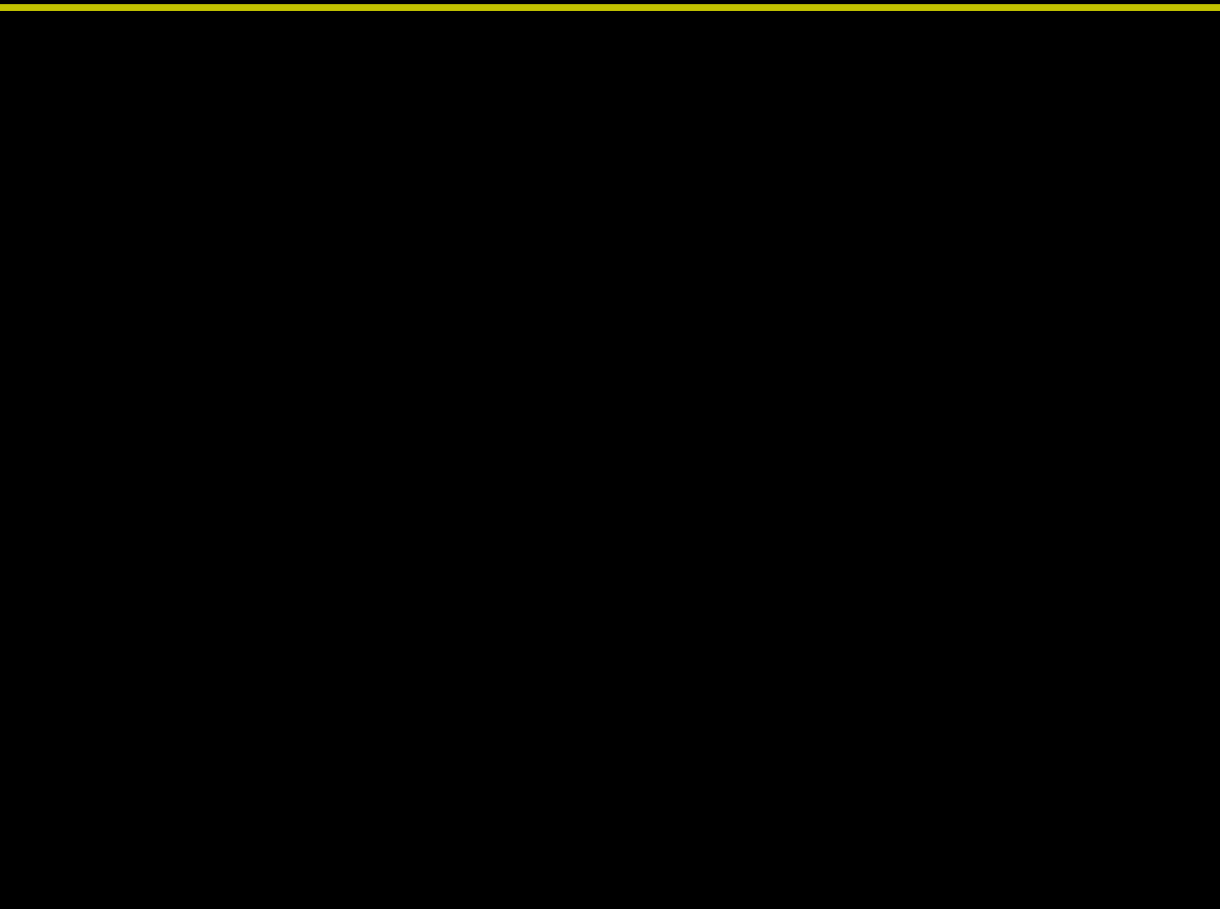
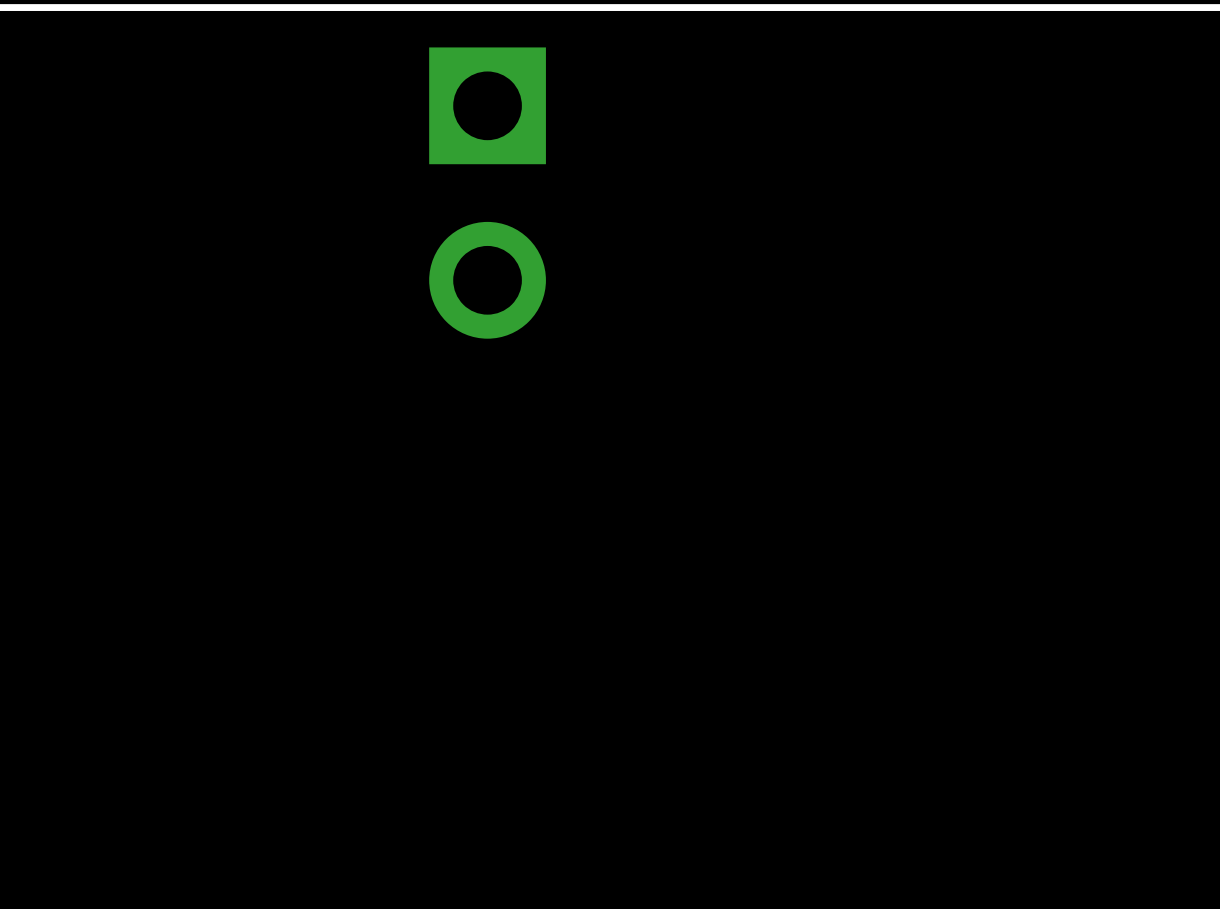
part: none -> (487, 193)

